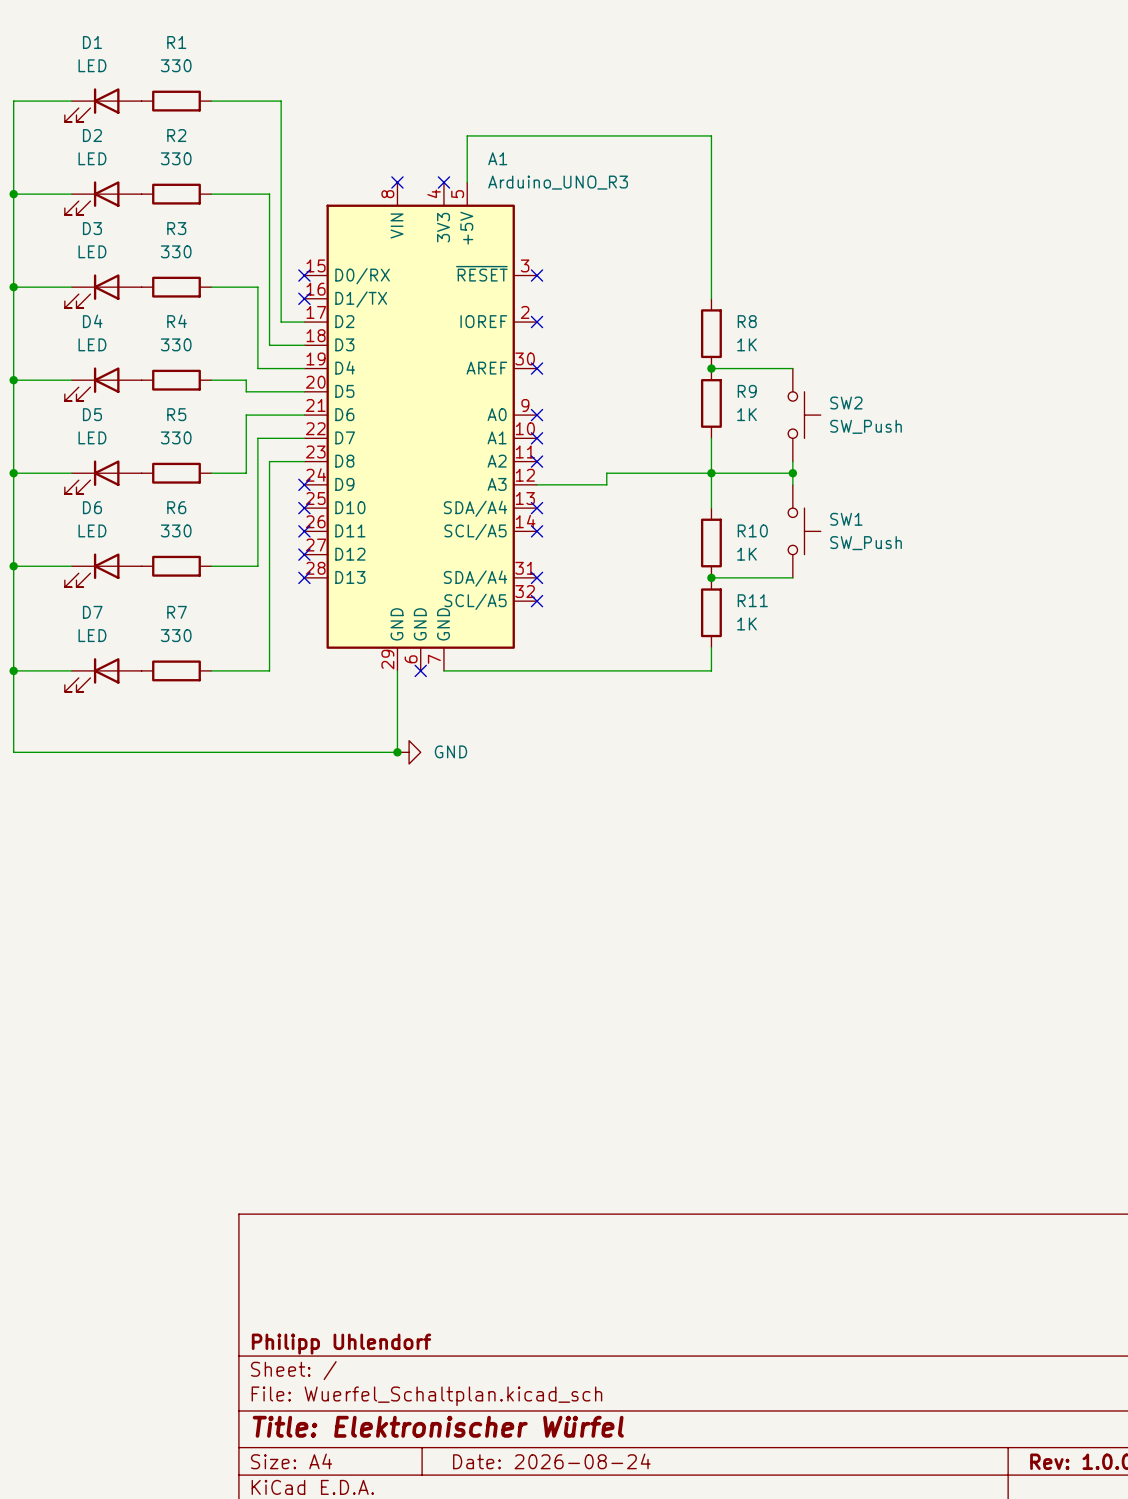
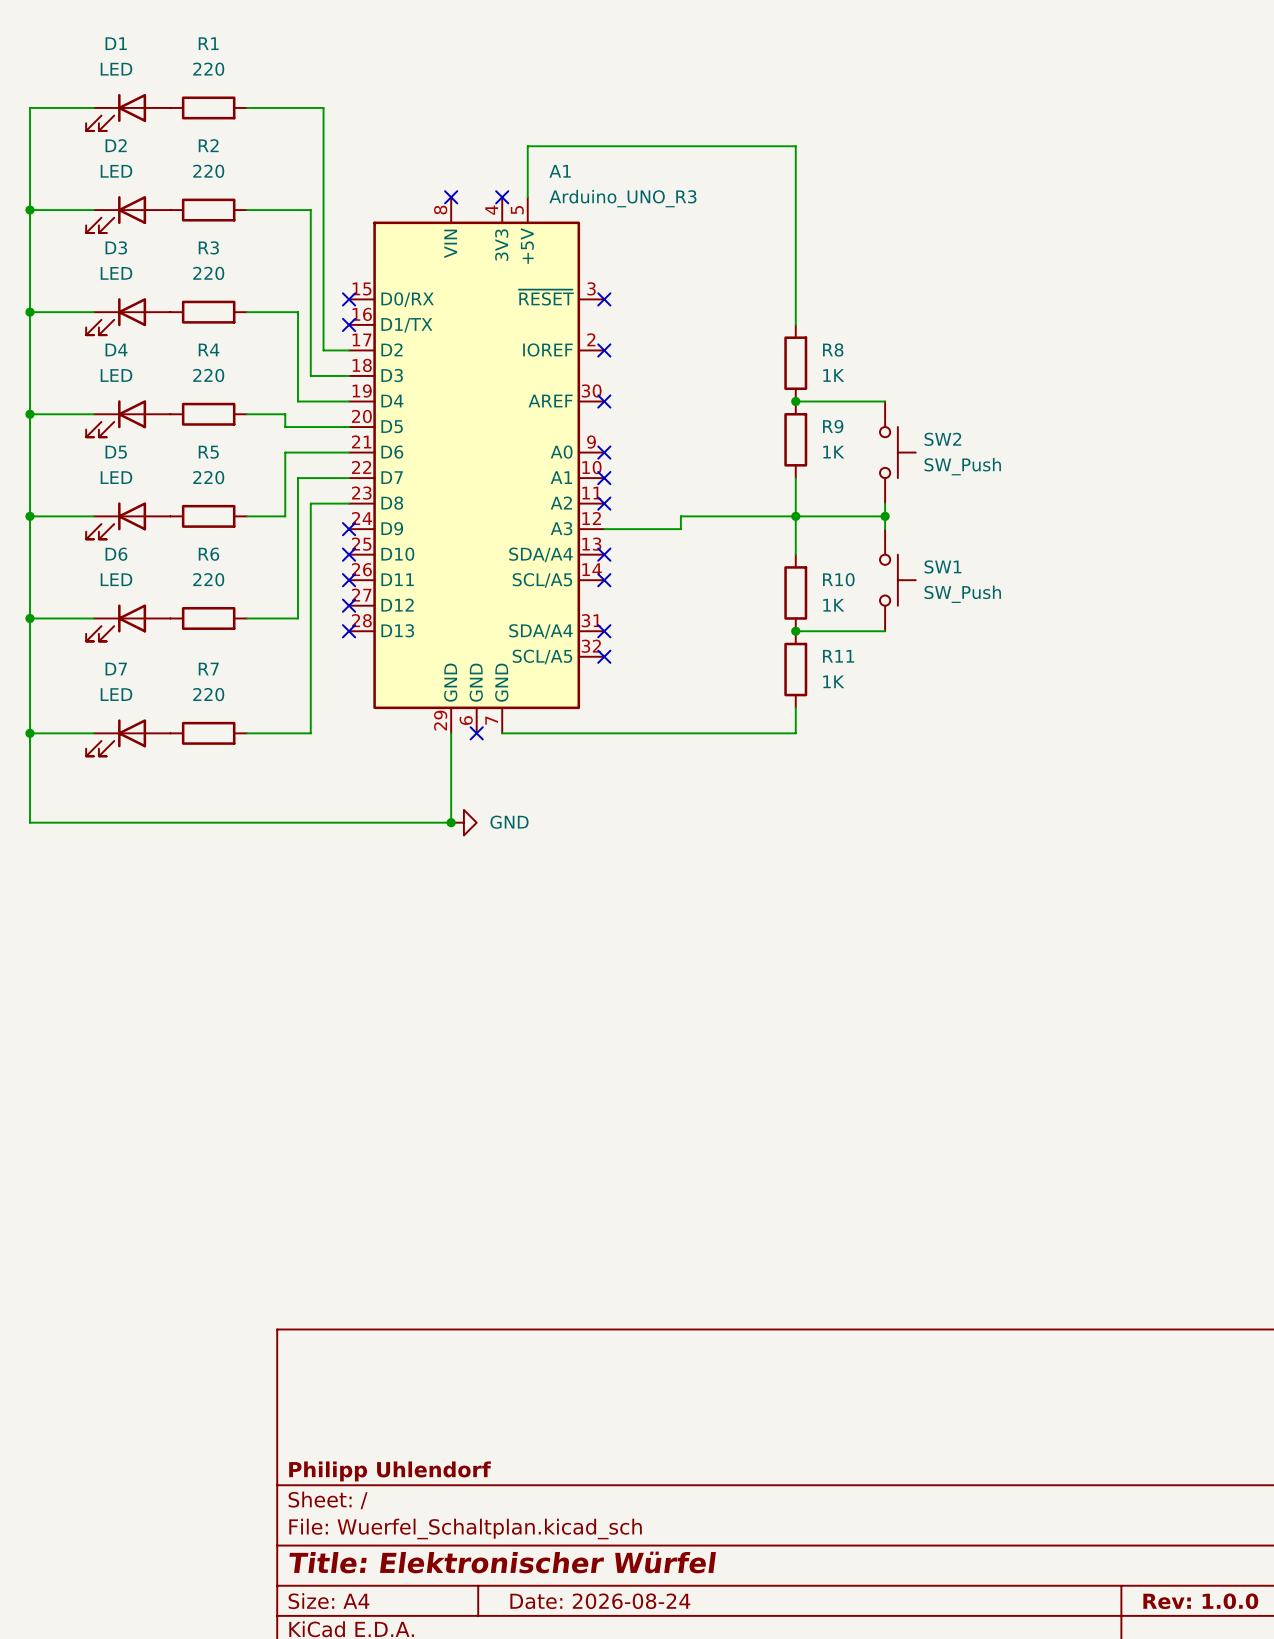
R1 value: 330 (176, 65) -> 220 (208, 69)
R2 value: 330 (176, 158) -> 220 (208, 171)
R3 value: 330 (176, 251) -> 220 (208, 273)
R4 value: 330 (176, 344) -> 220 (208, 375)
R5 value: 330 (176, 437) -> 220 (208, 477)
R6 value: 330 (176, 530) -> 220 (208, 579)
R7 value: 330 (176, 635) -> 220 (208, 694)

